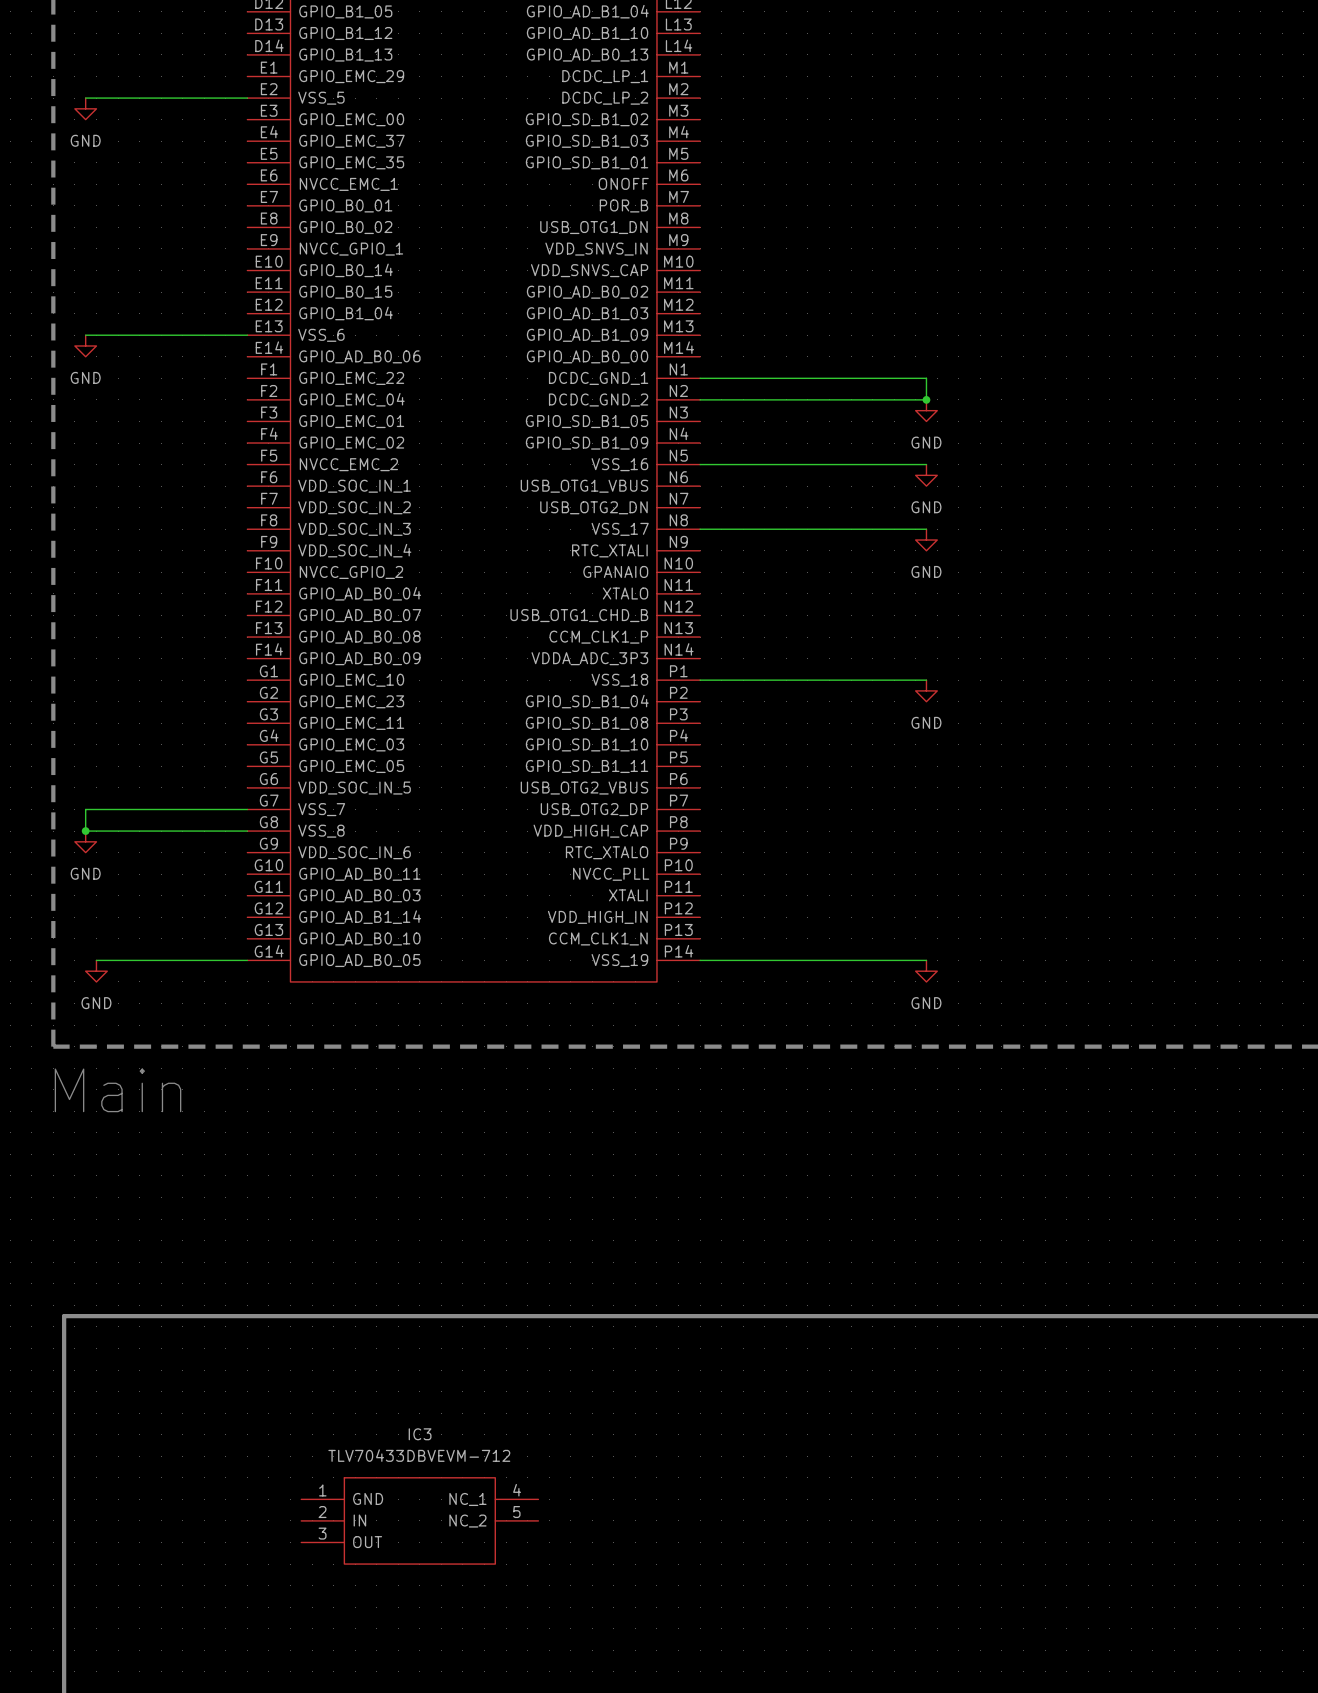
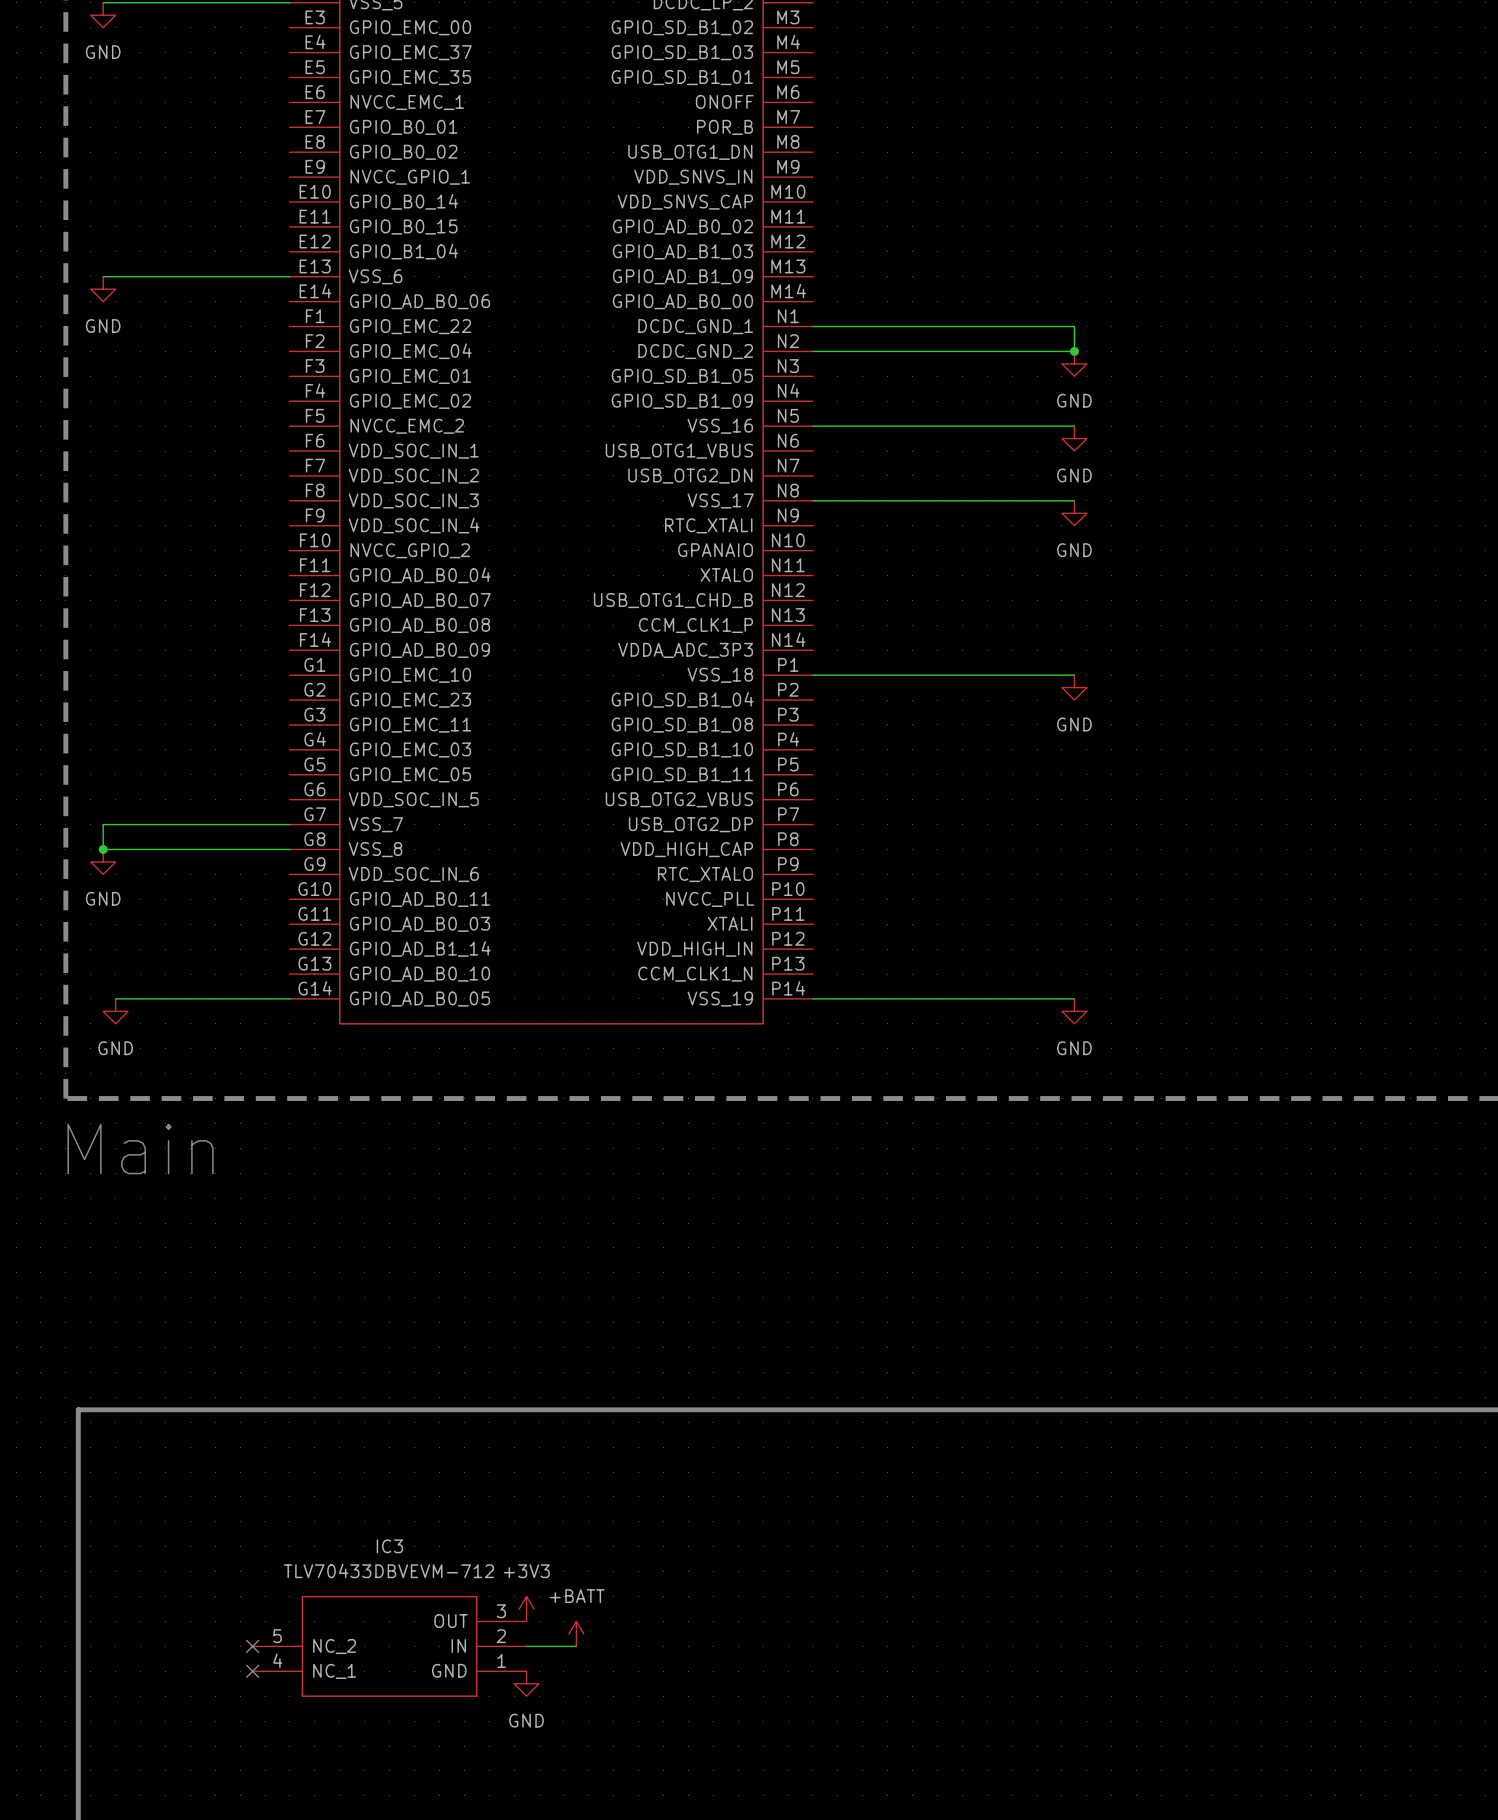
power symbol: none -> +3V3 (526, 1609)
power symbol: none -> +BATT (576, 1633)
no-connect mark: none -> (252, 1646)
IC3 rotation: 0° (419, 1520) -> 180° (389, 1646)
wire: none -> (526, 1646) (576, 1646)
no-connect mark: none -> (252, 1671)
power symbol: none -> GND (526, 1683)

